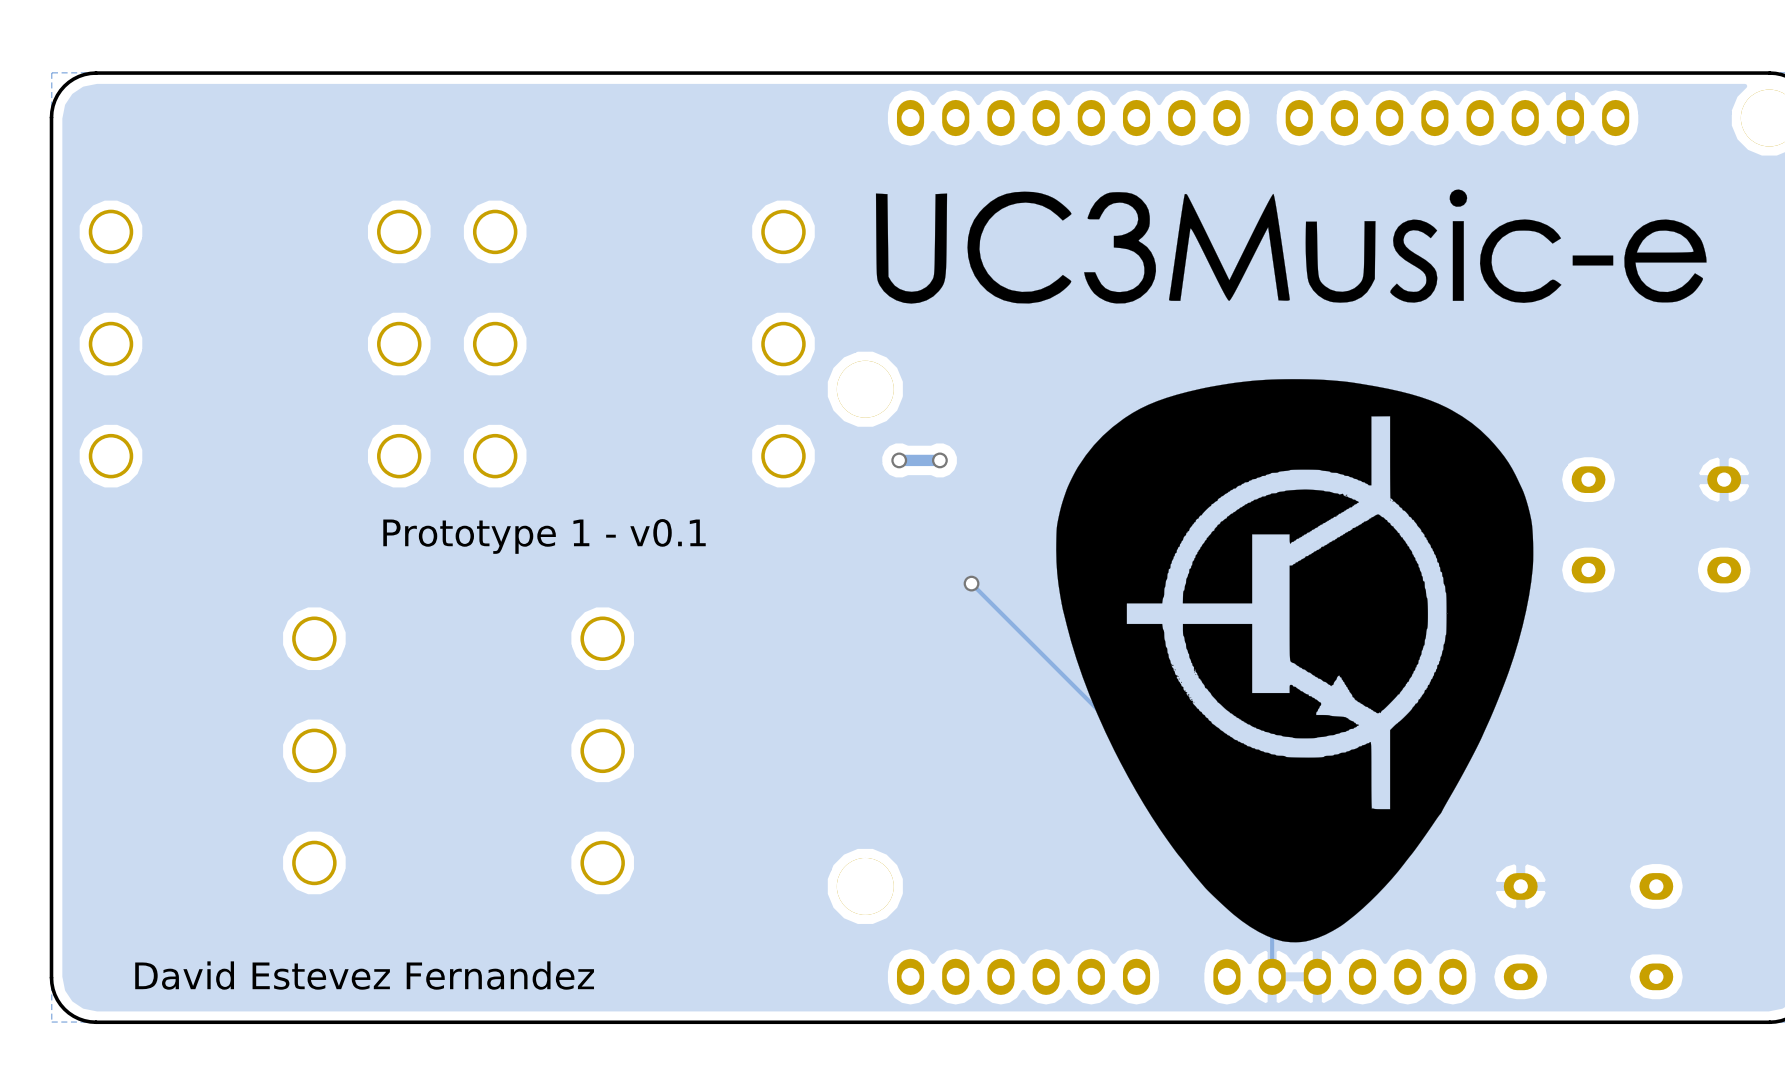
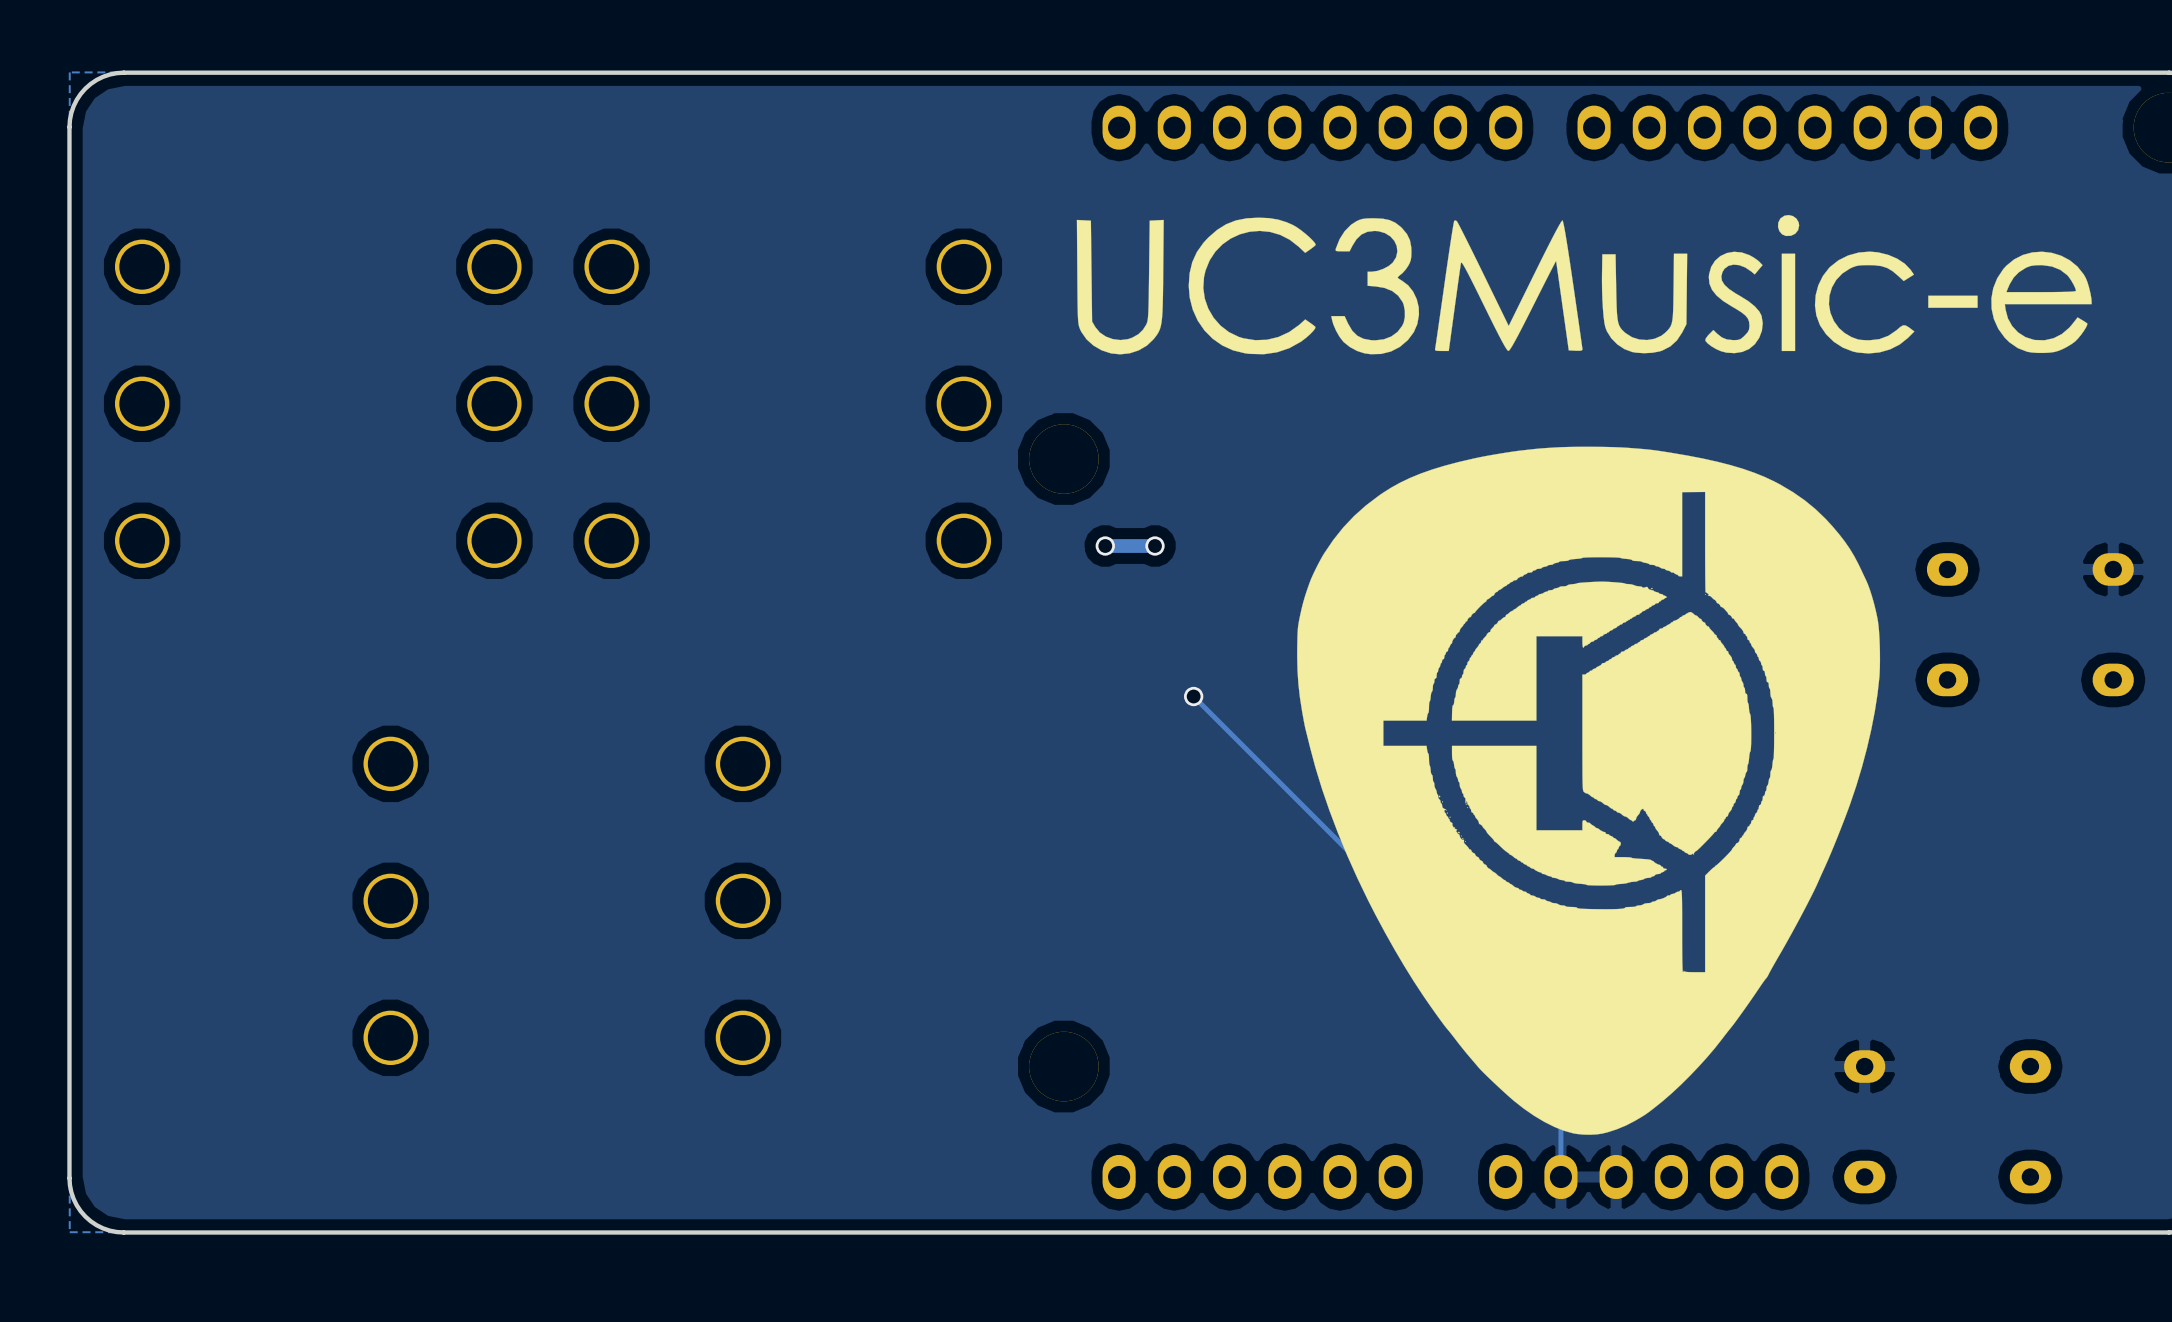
text: Prototype 1 - v0.1 (544, 536) -> none
text: David Estevez Fernandez (364, 975) -> none

